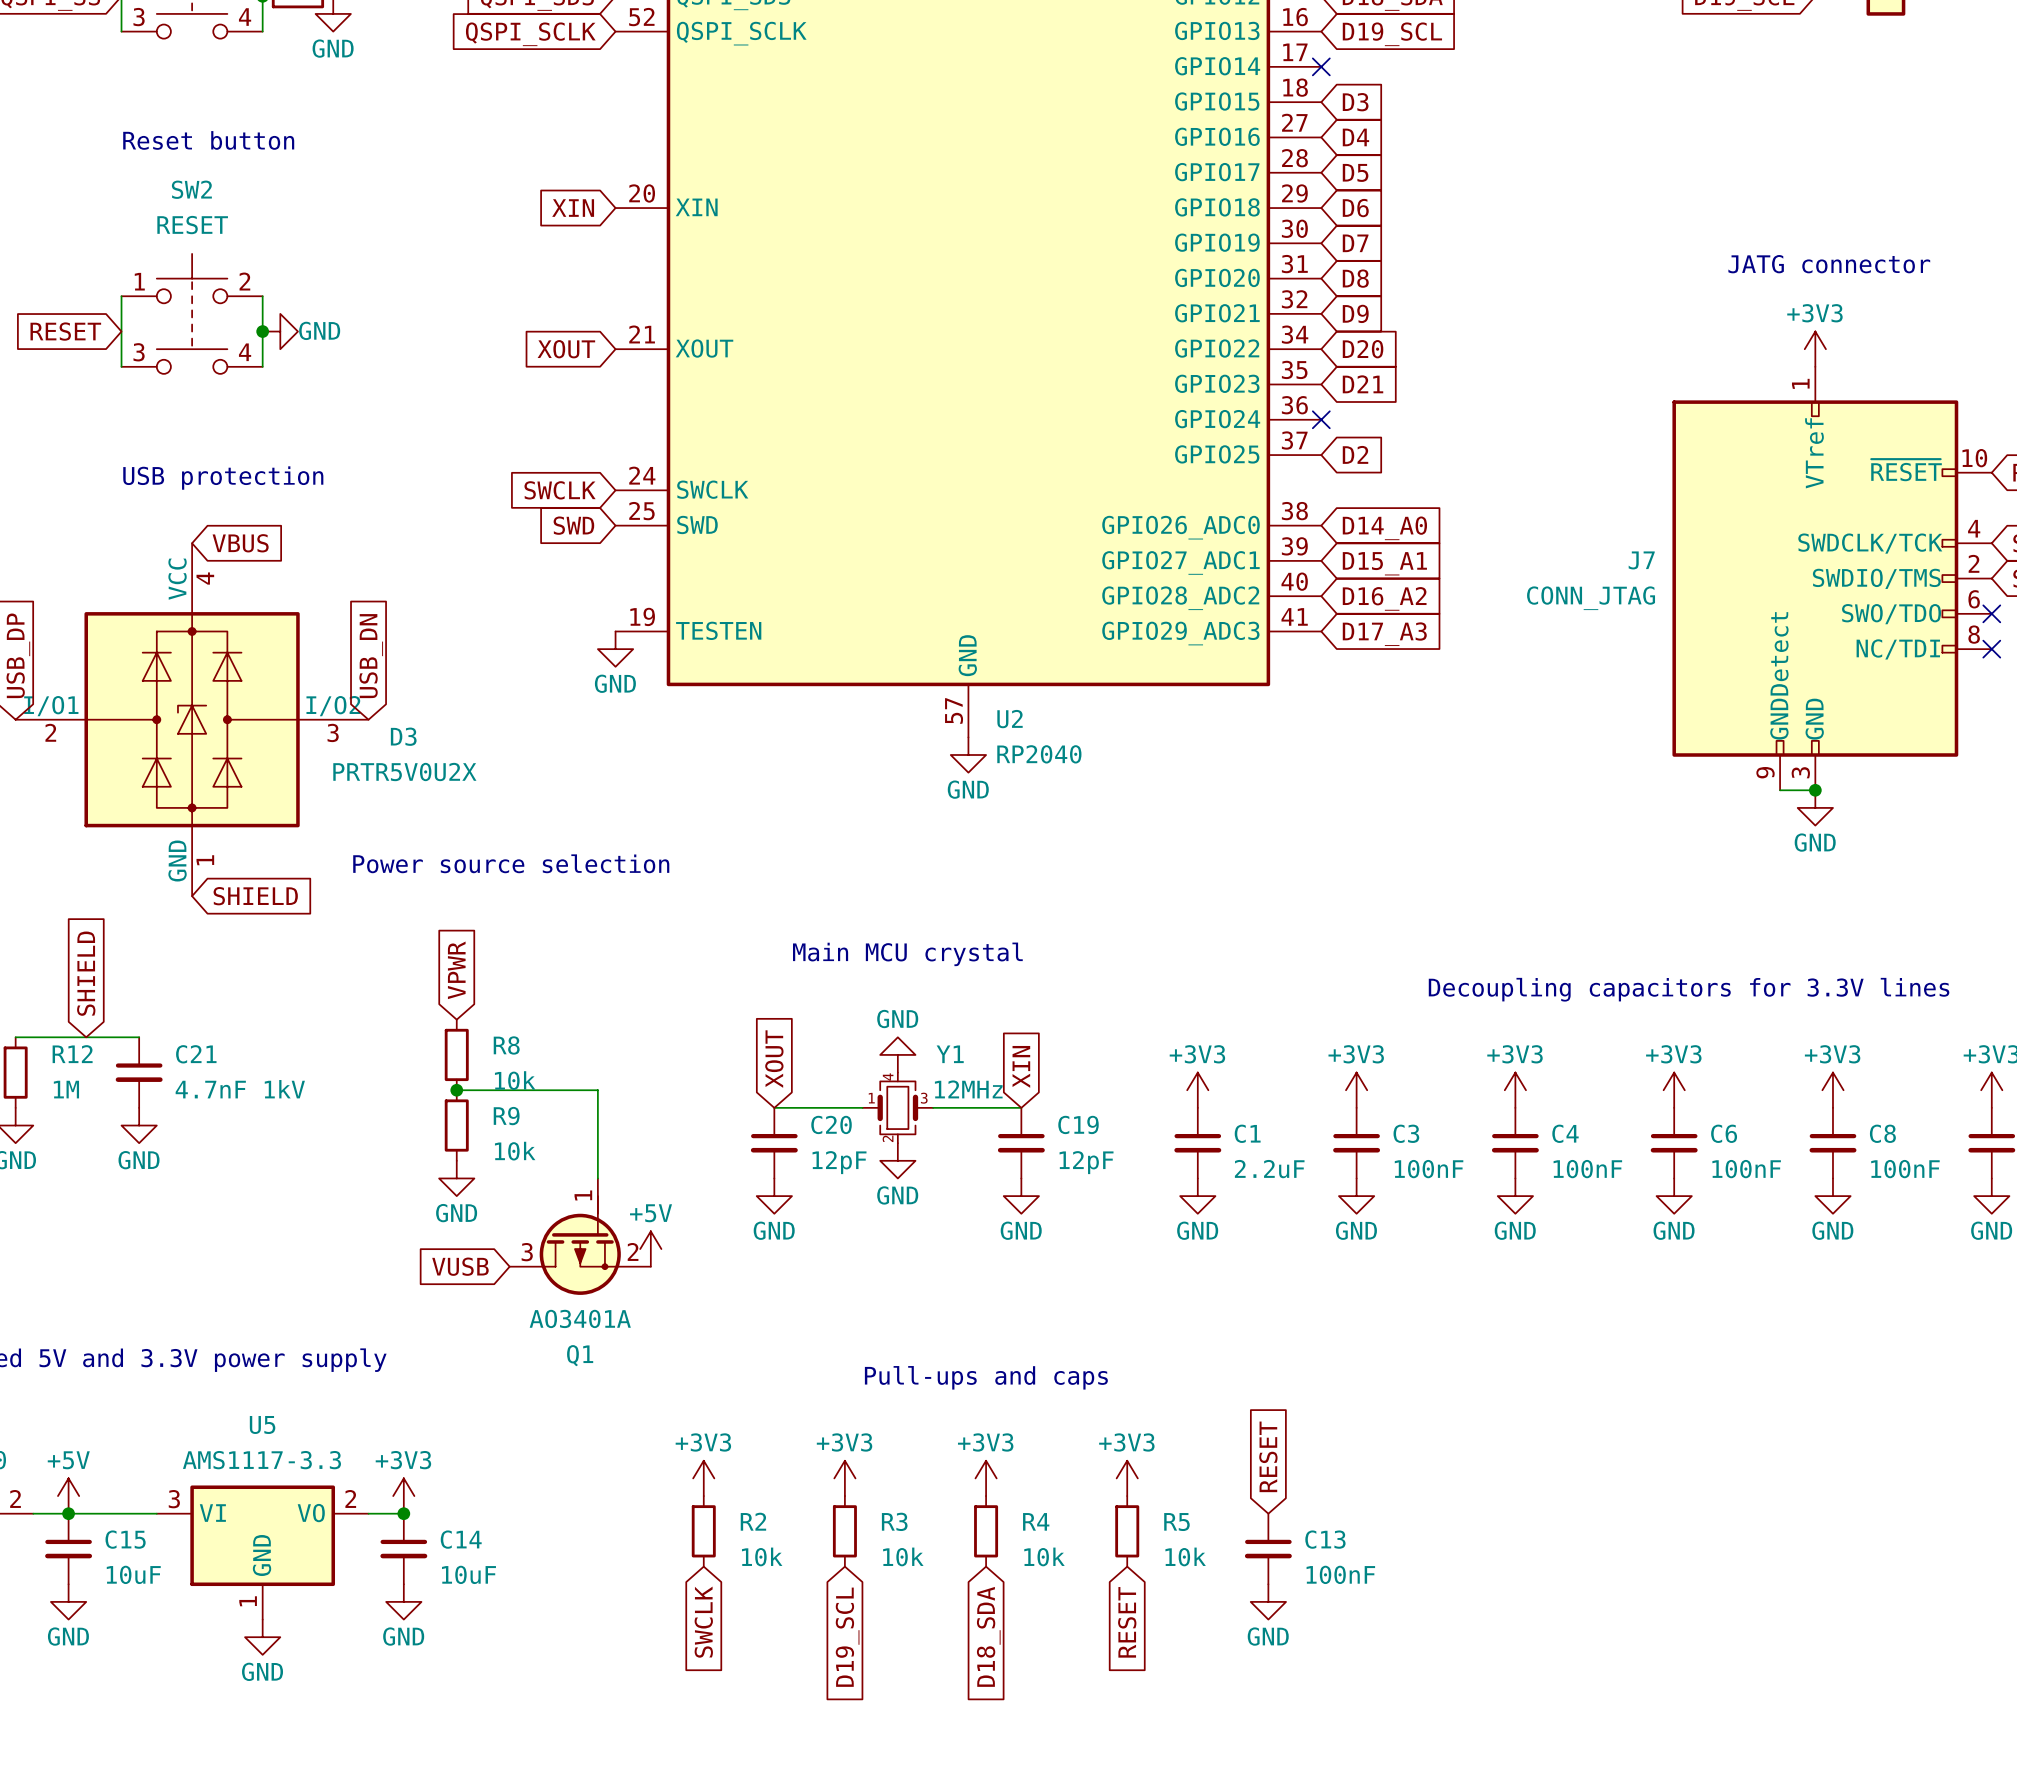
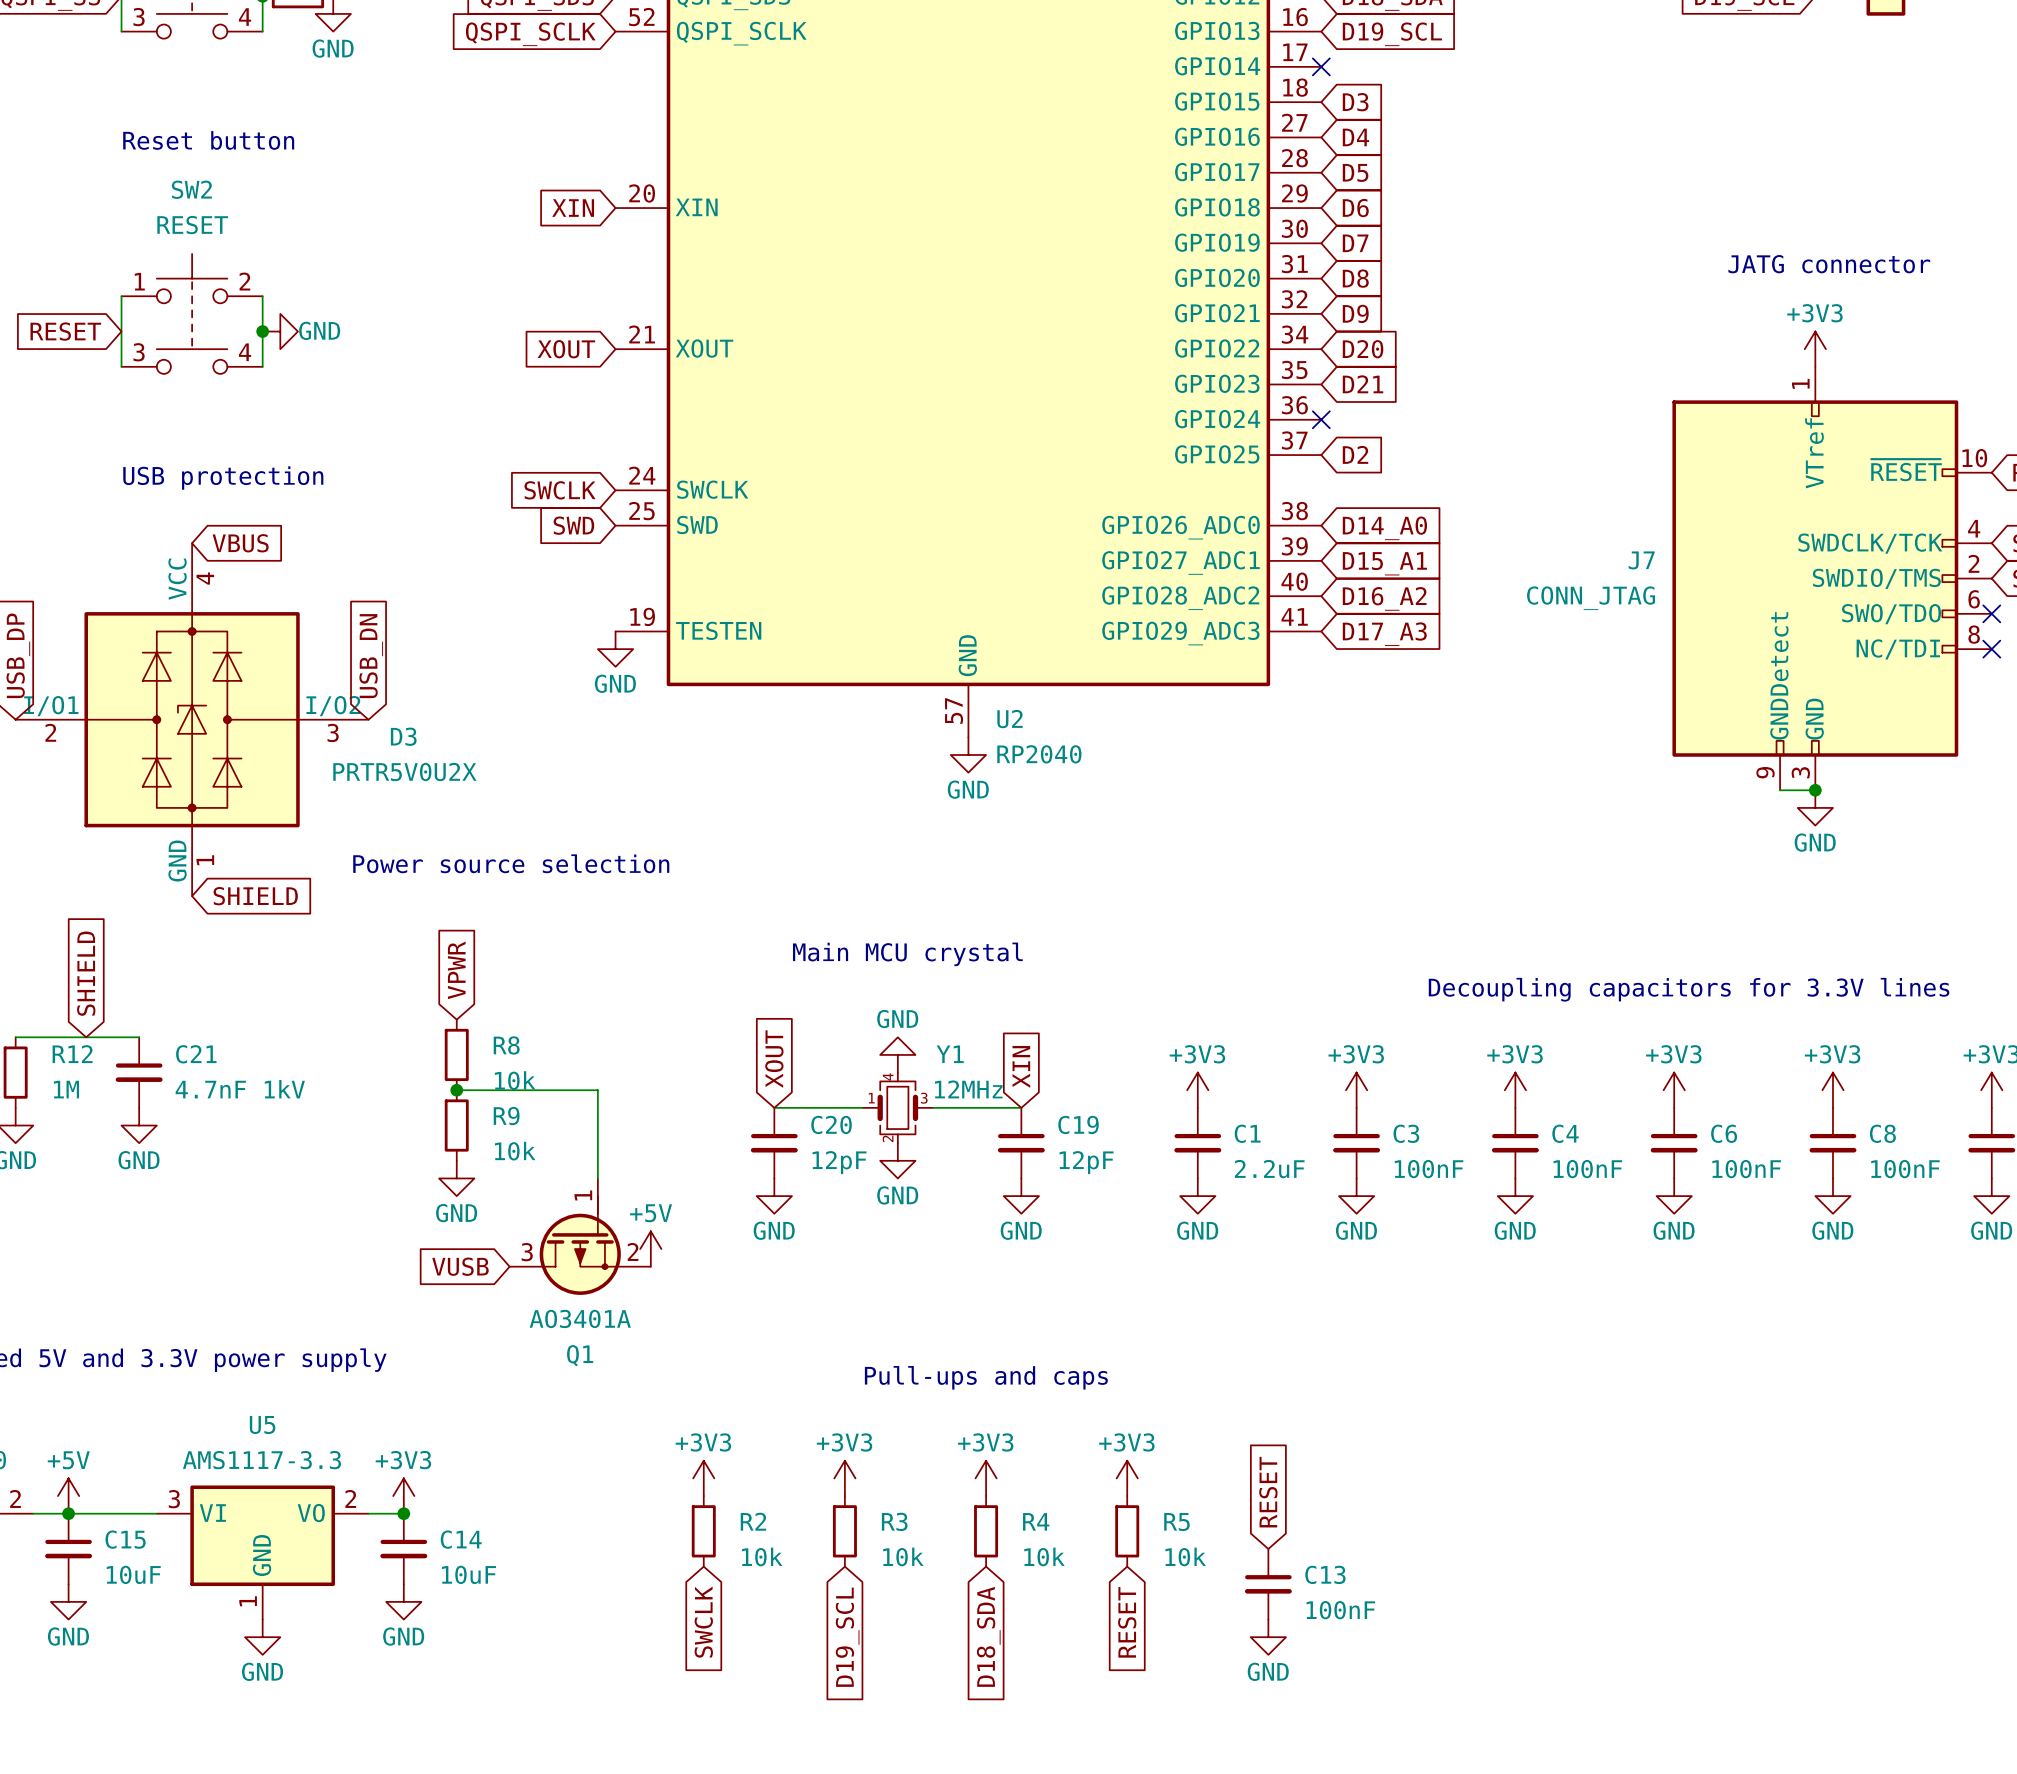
global label position: RESET (1268, 1456) -> RESET (1268, 1492)
C13 position: (1268, 1548) -> (1268, 1584)
power symbol position: GND (1268, 1601) -> GND (1268, 1637)

